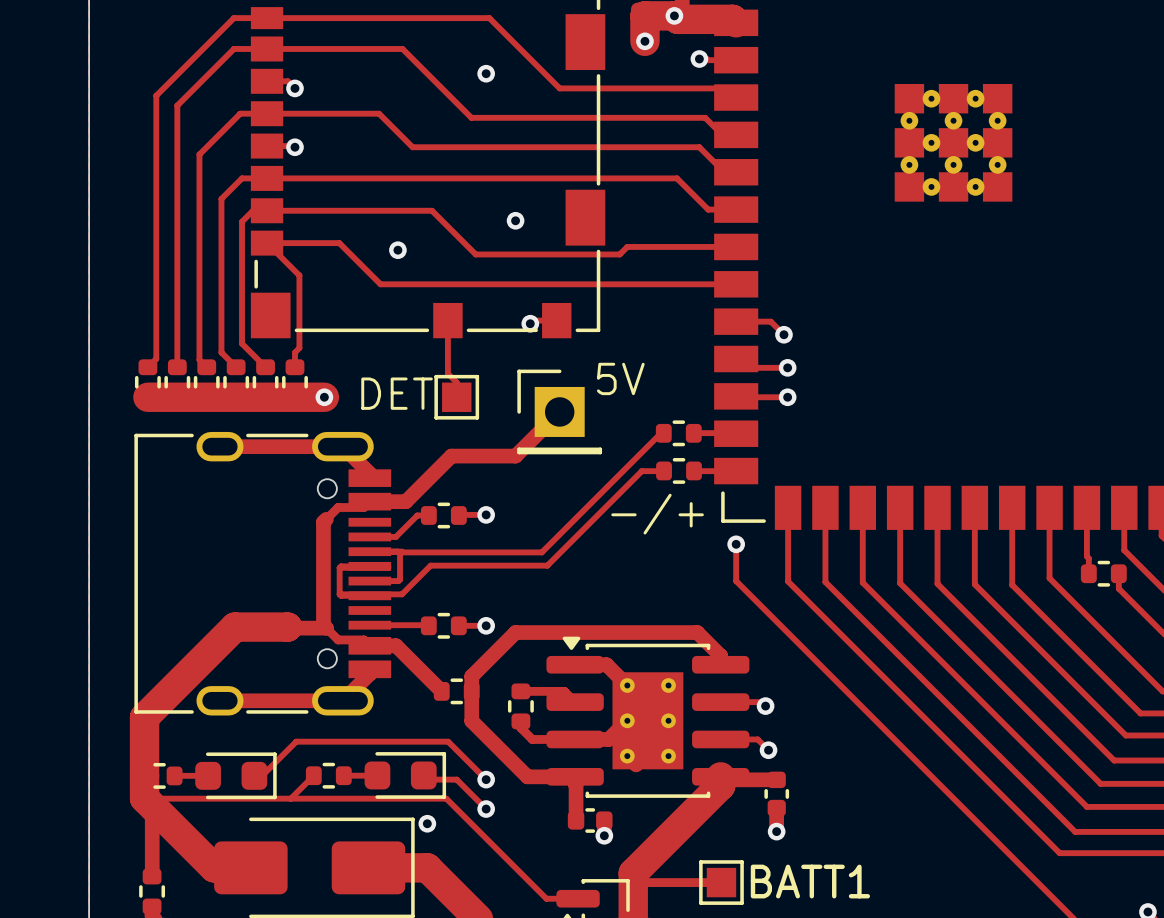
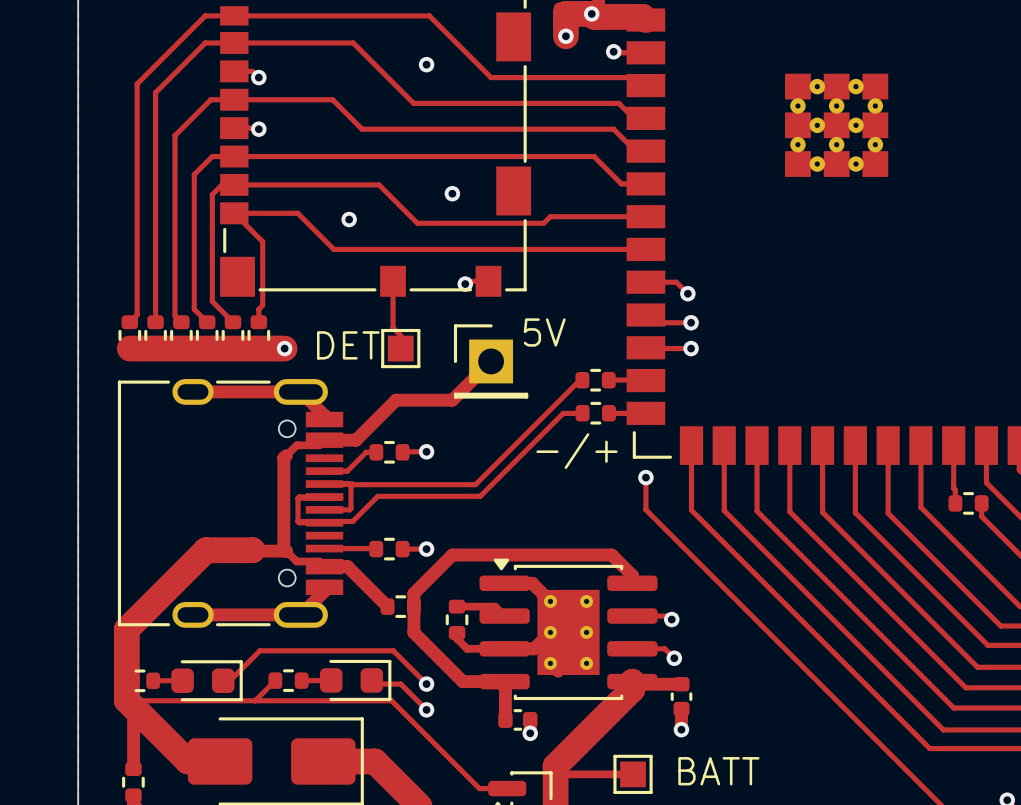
via: (427, 823) -> none
text: none -> BATT (718, 771)
BATT1 name: BATT1 (810, 881) -> none

